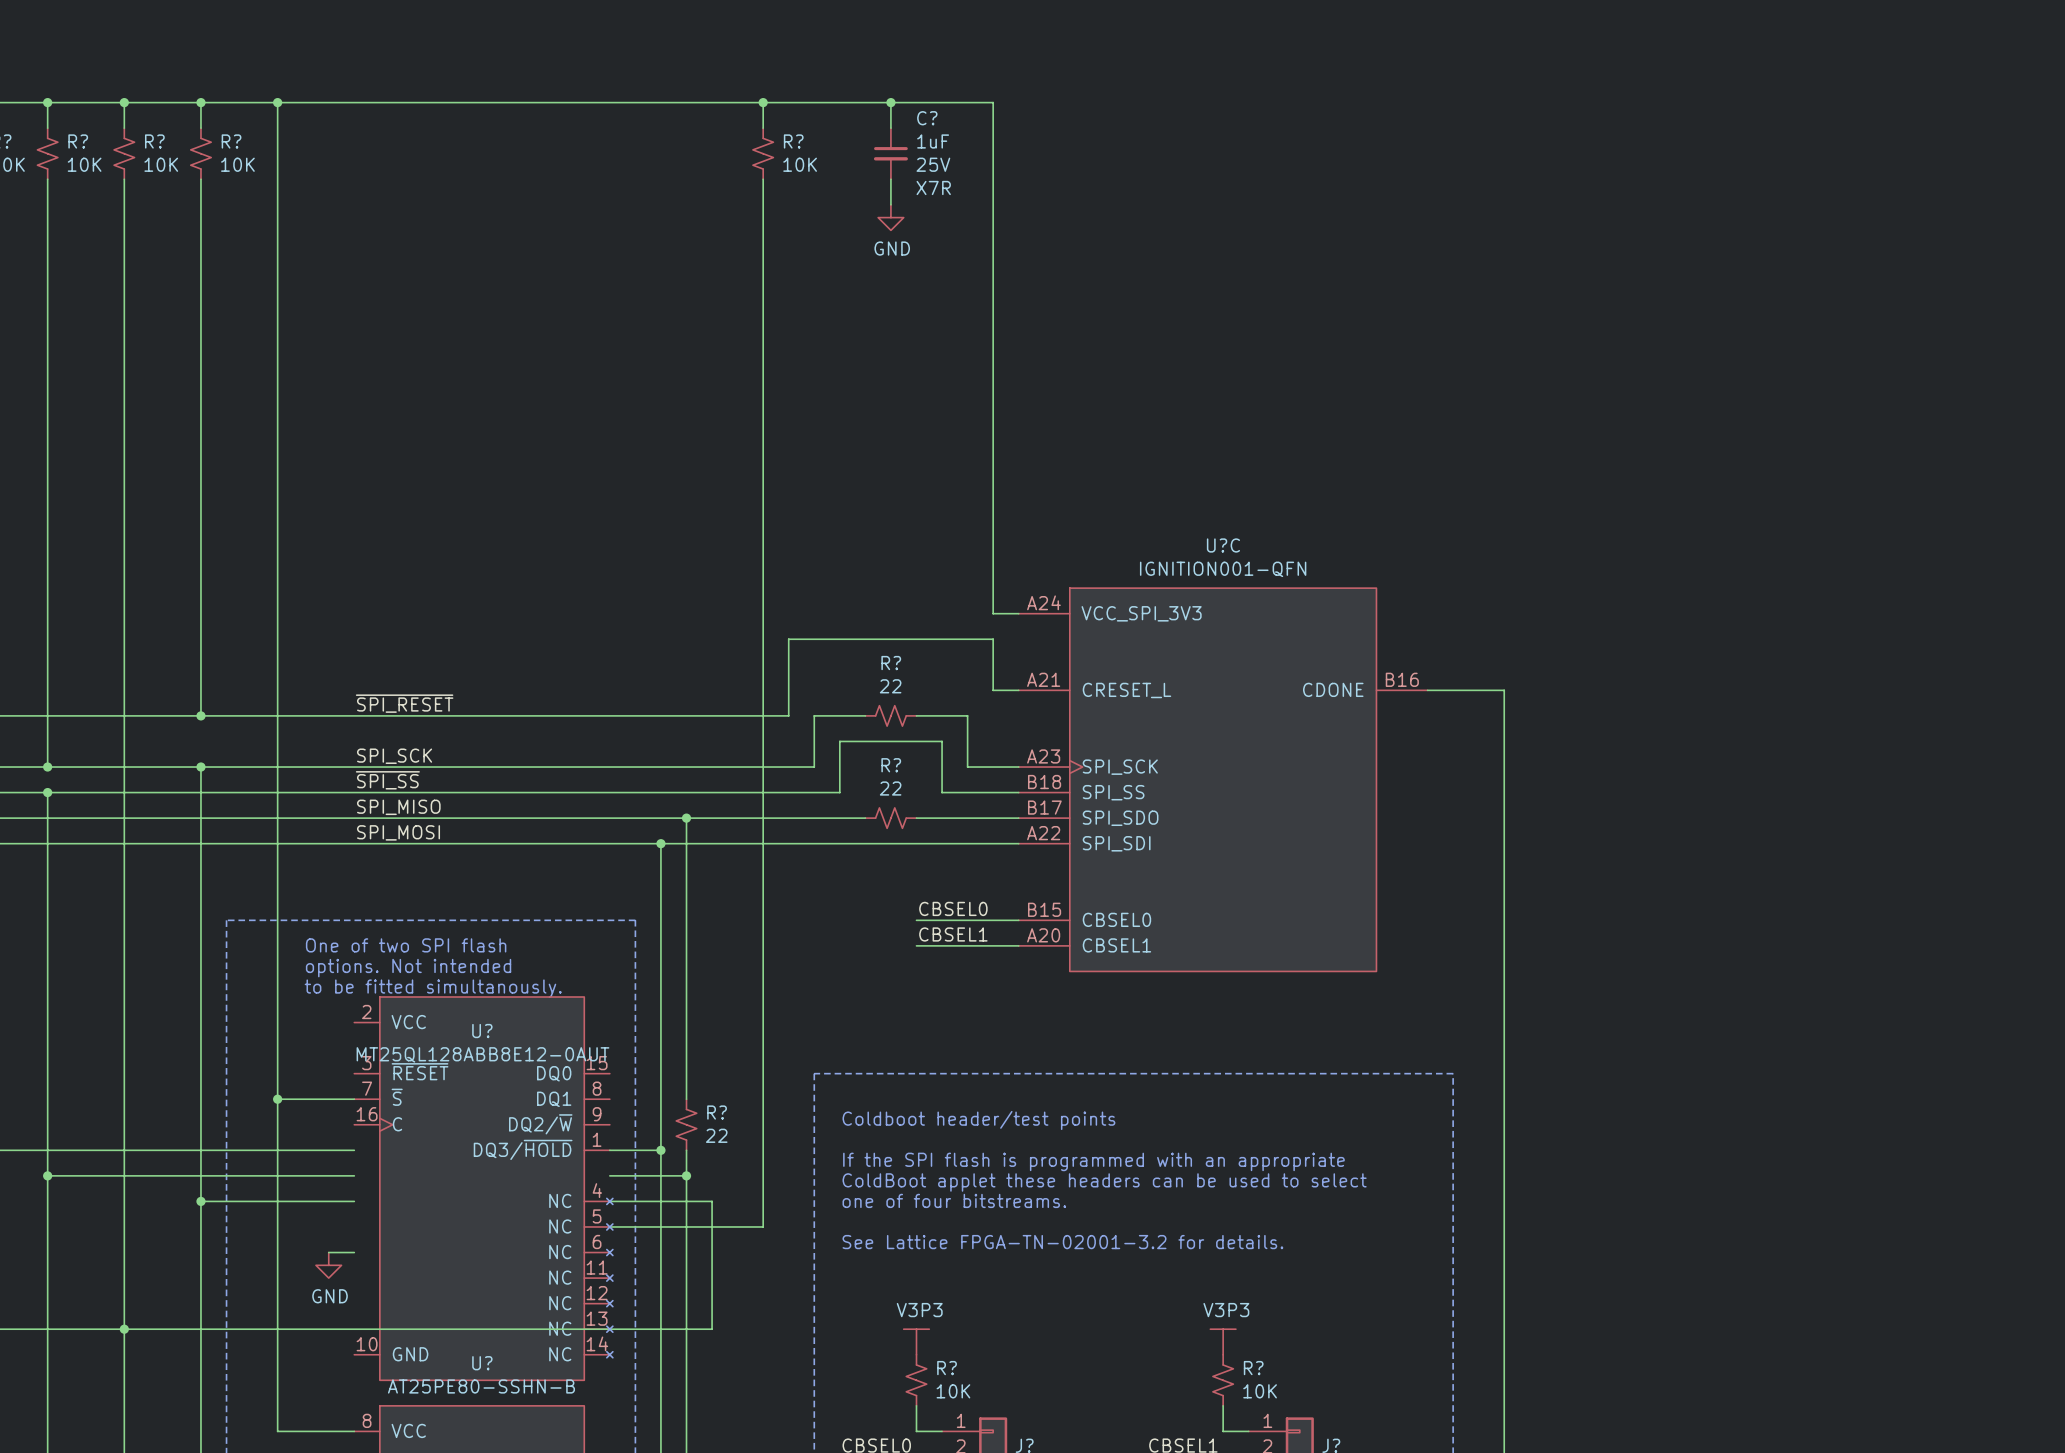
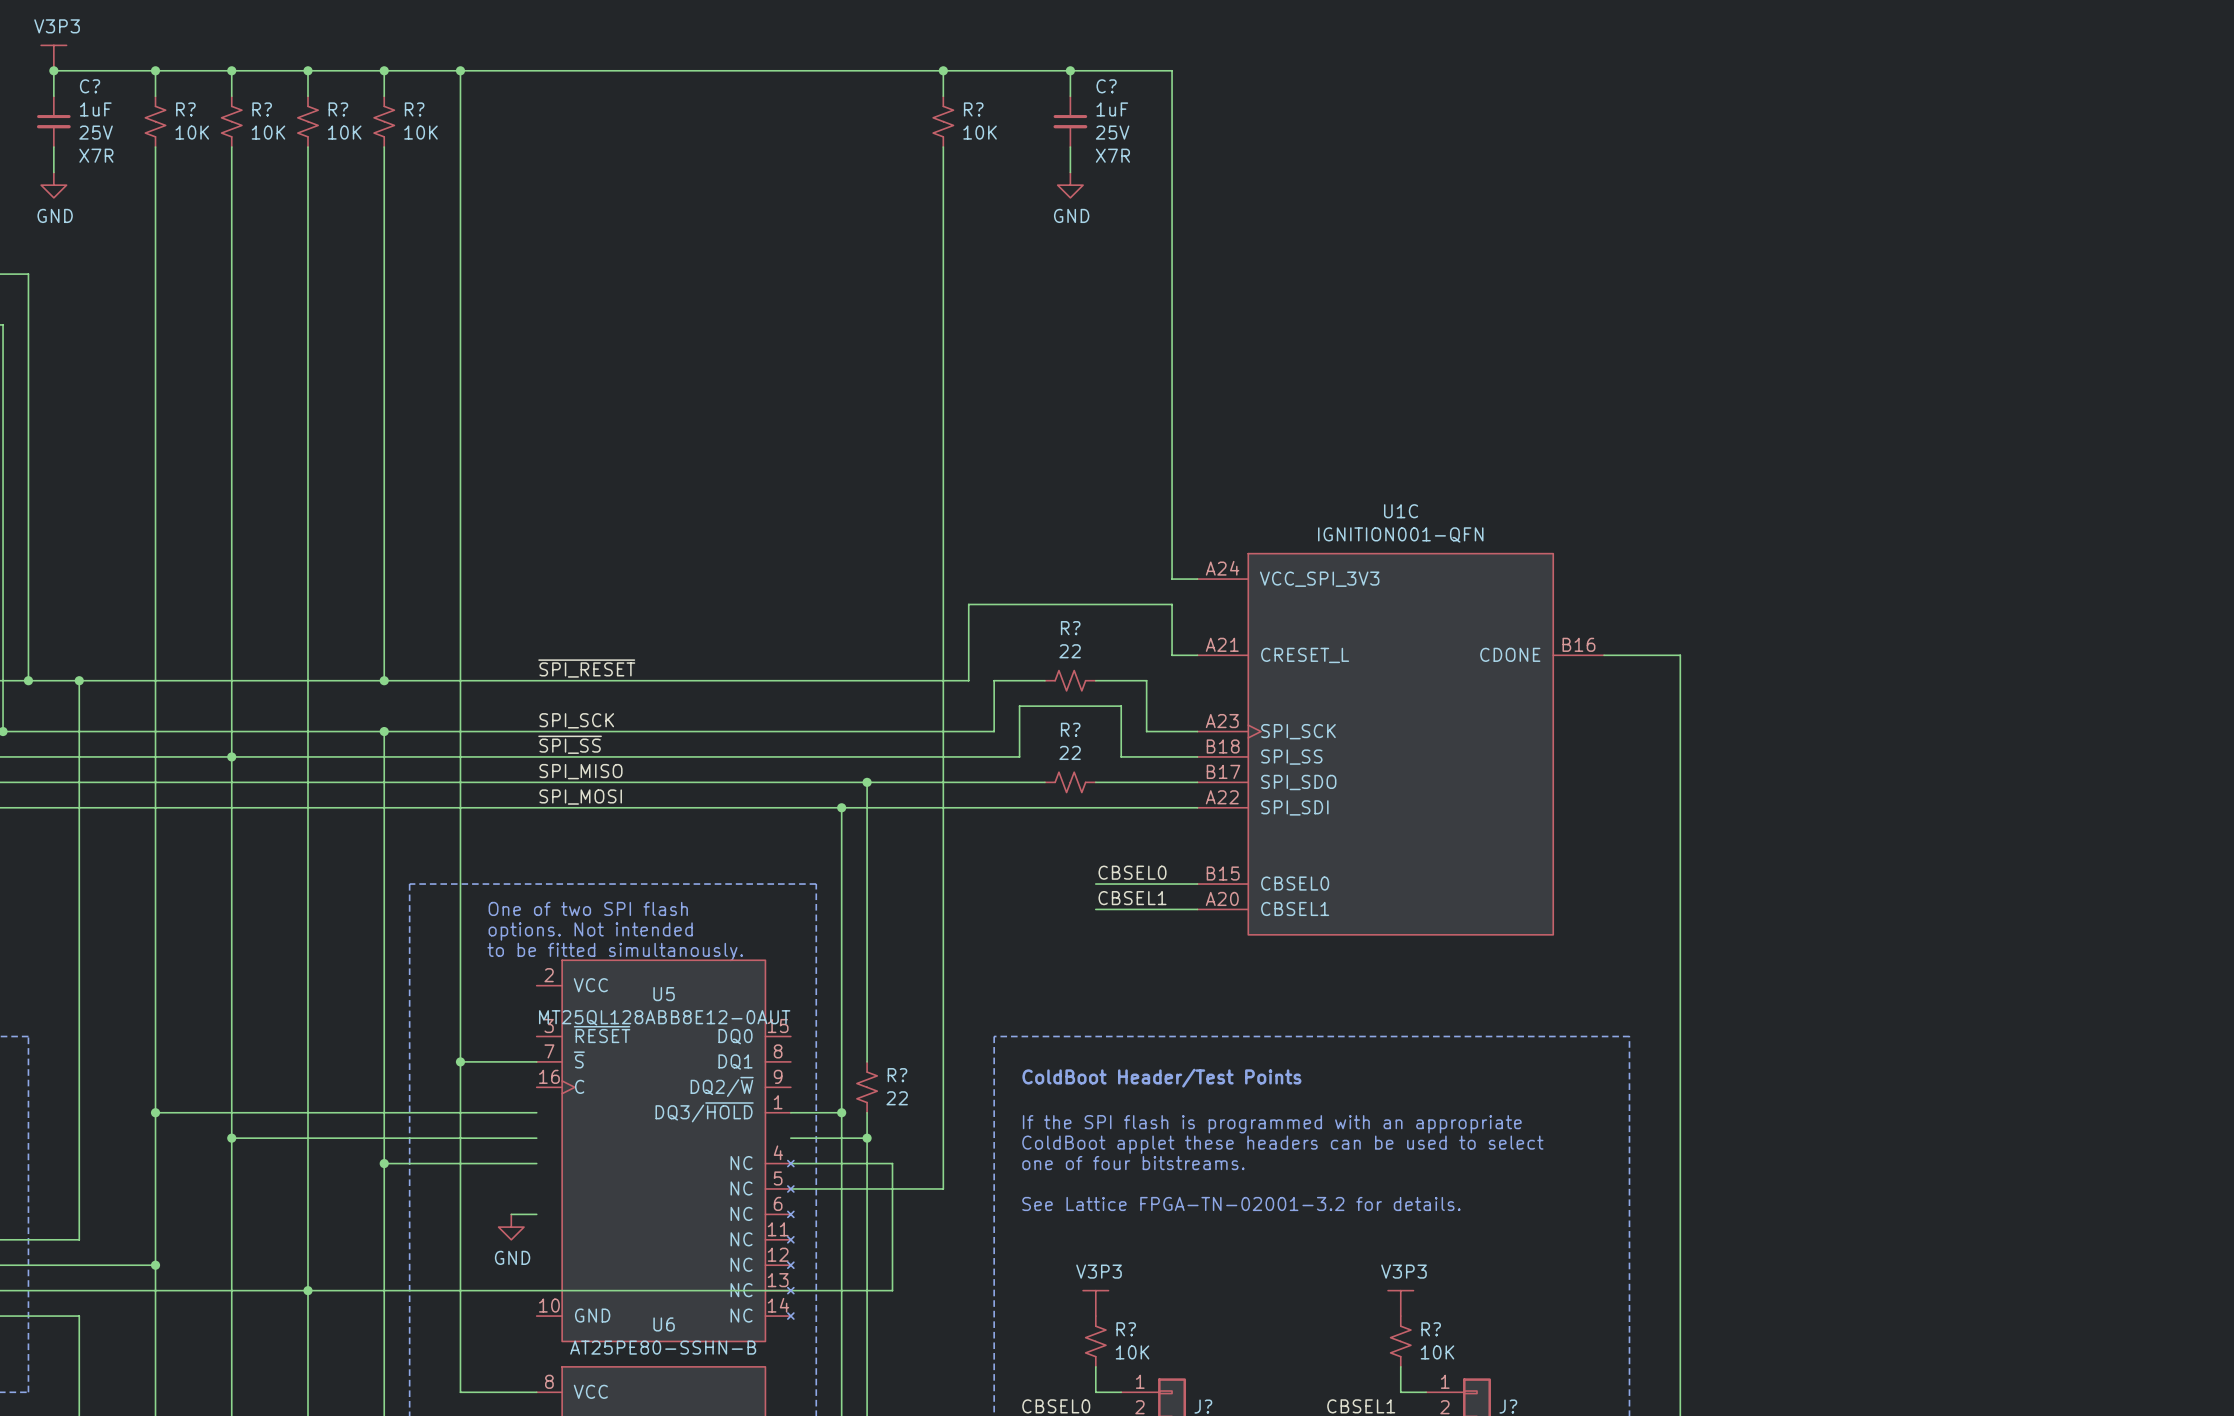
U?C name: U?C (1223, 545) -> U1C (1401, 511)
wire: none -> (231, 731) (231, 756)
junction: (47, 767) -> none
U? name: U? (482, 1031) -> U5 (664, 994)
text: Coldboot header/test points (978, 1120) -> ColdBoot Header/Test Points (1161, 1078)
U? name: U? (482, 1363) -> U6 (664, 1324)

